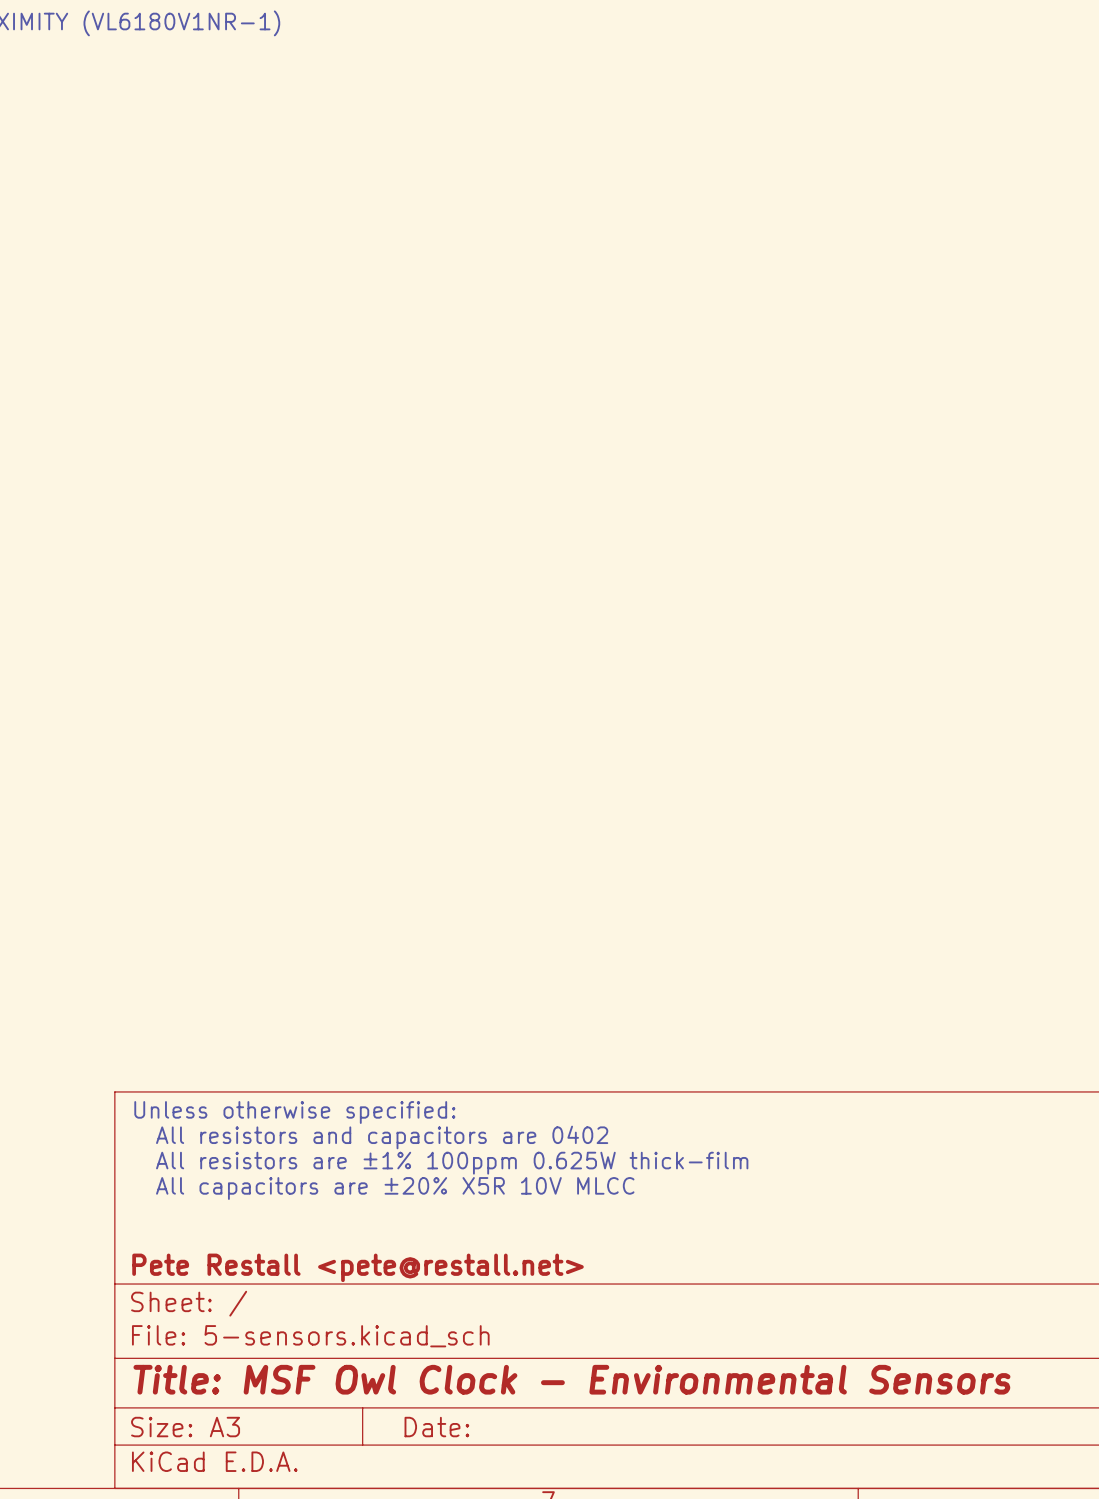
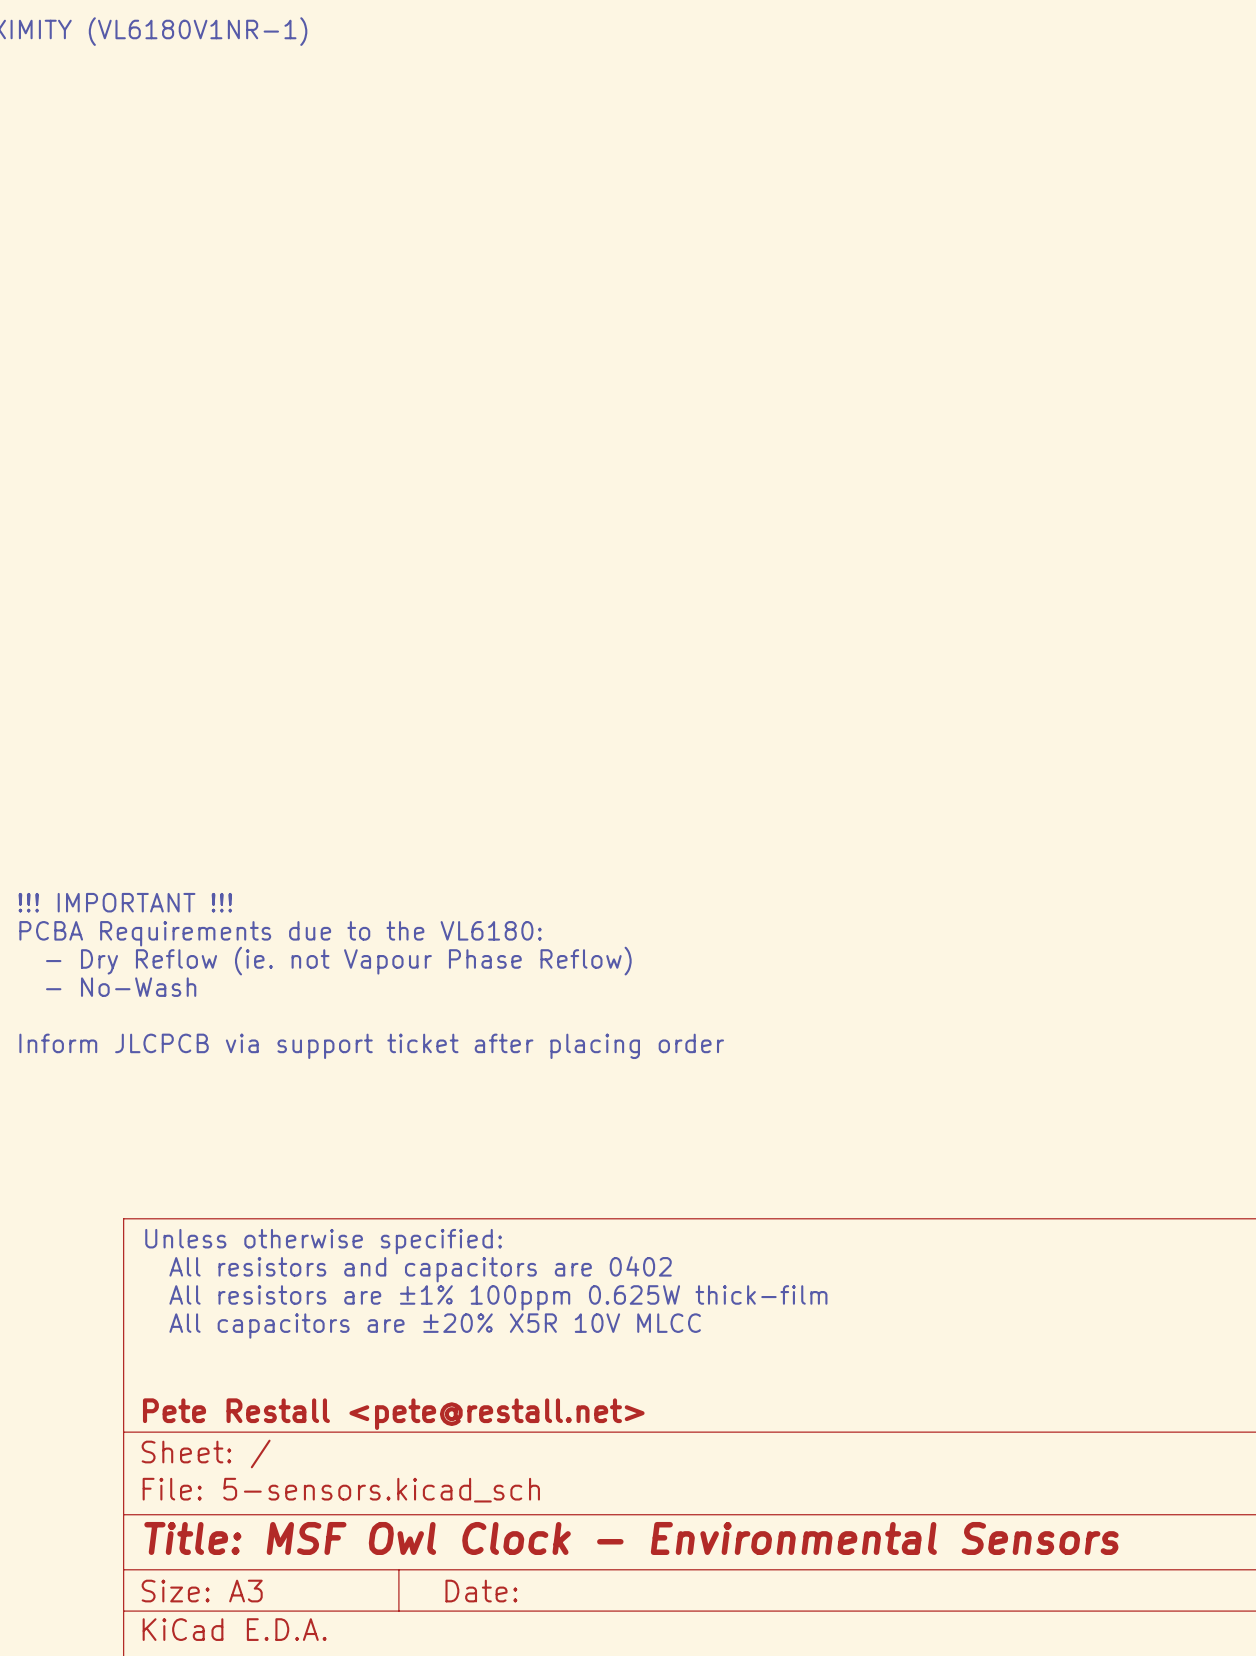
text: none -> !!! IMPORTANT !!! (125, 902)
text: none -> PCBA Requirements due to the VL6180: (280, 933)
text: none -> - Dry Reflow (ie. not Vapour Phase Reflow) (338, 961)
text: none -> - No-Wash (121, 987)
text: none -> Inform JLCPCB via support ticket after placing order (371, 1046)

